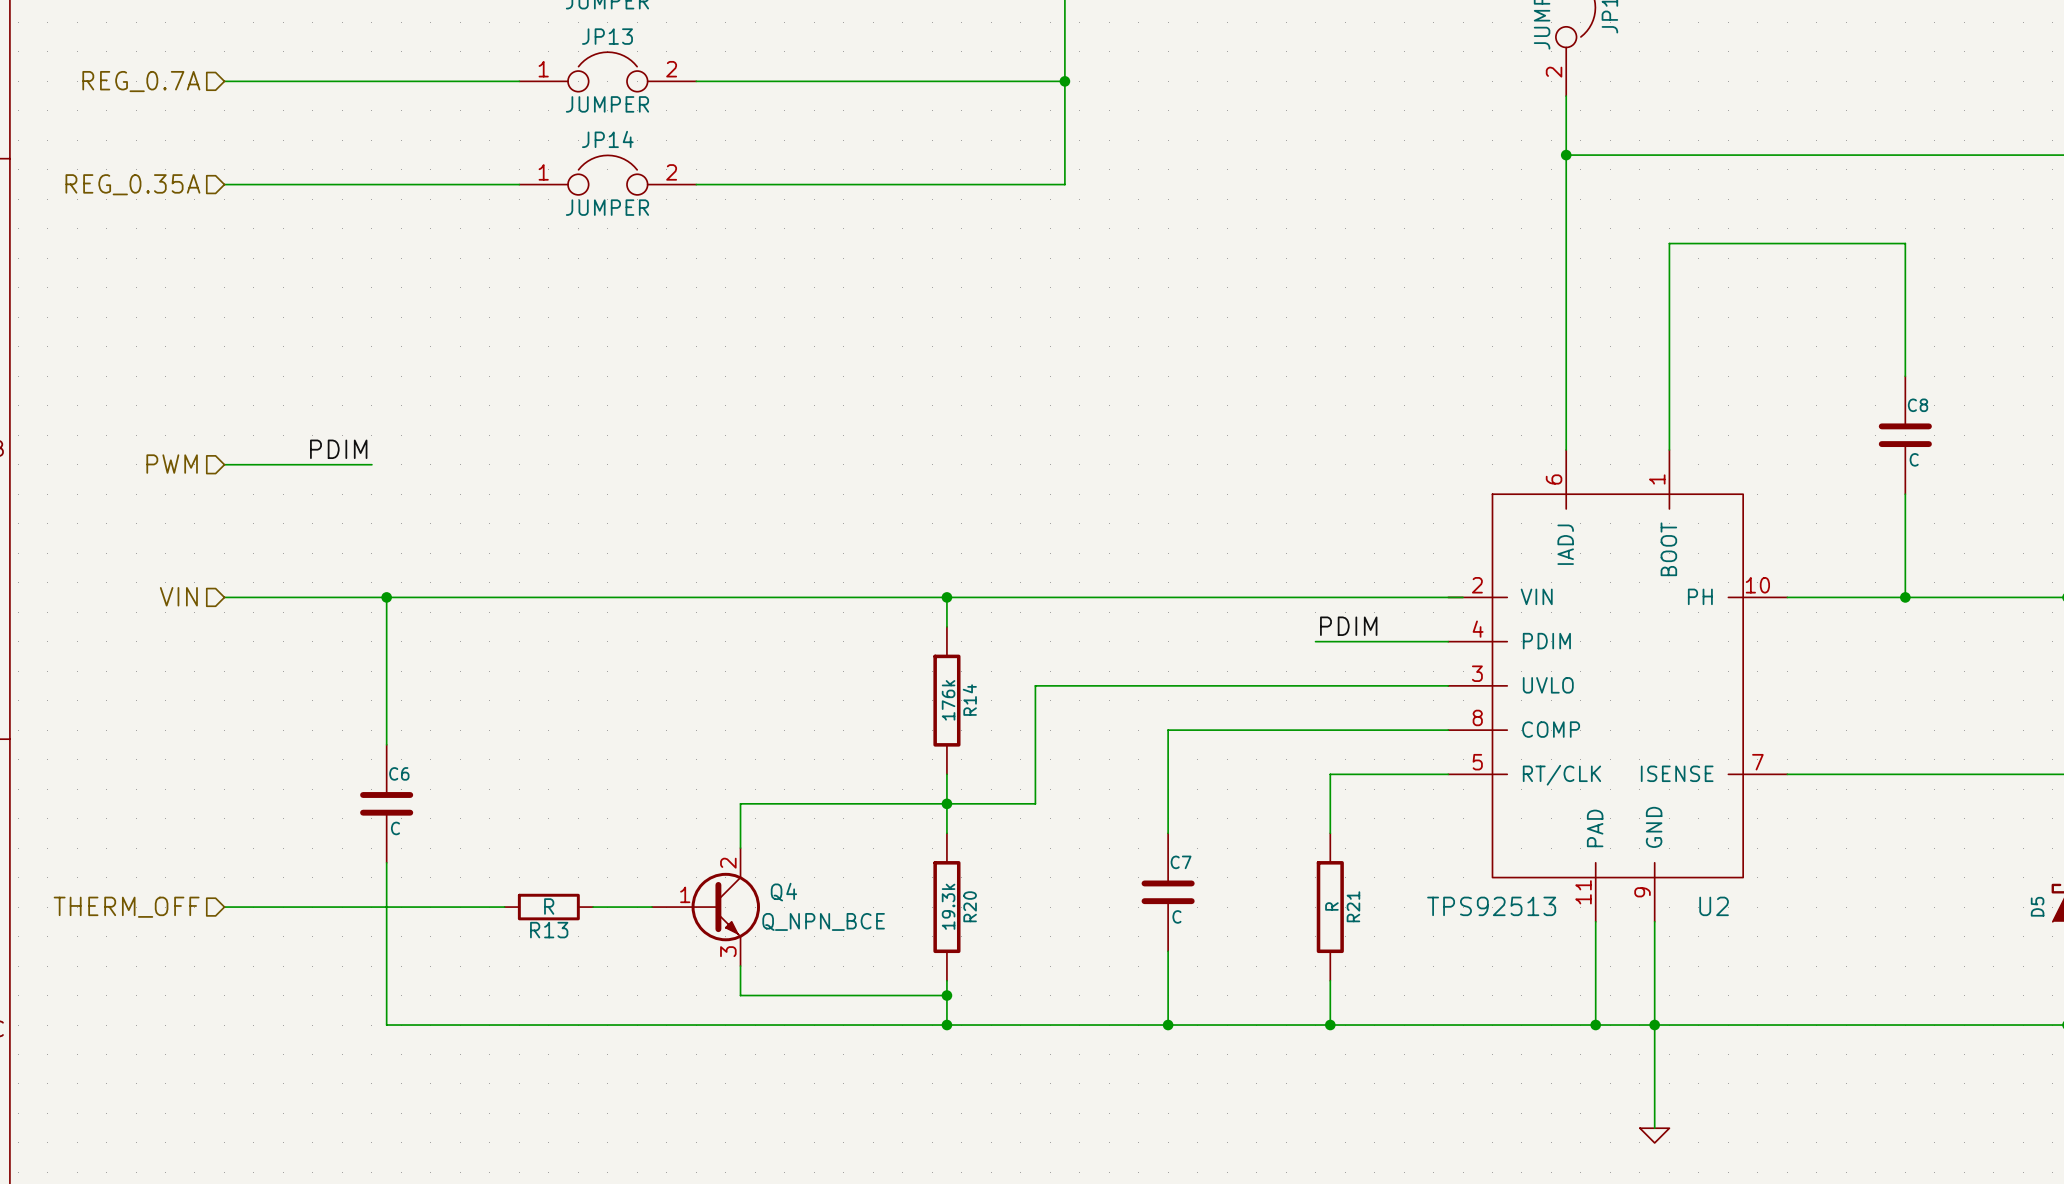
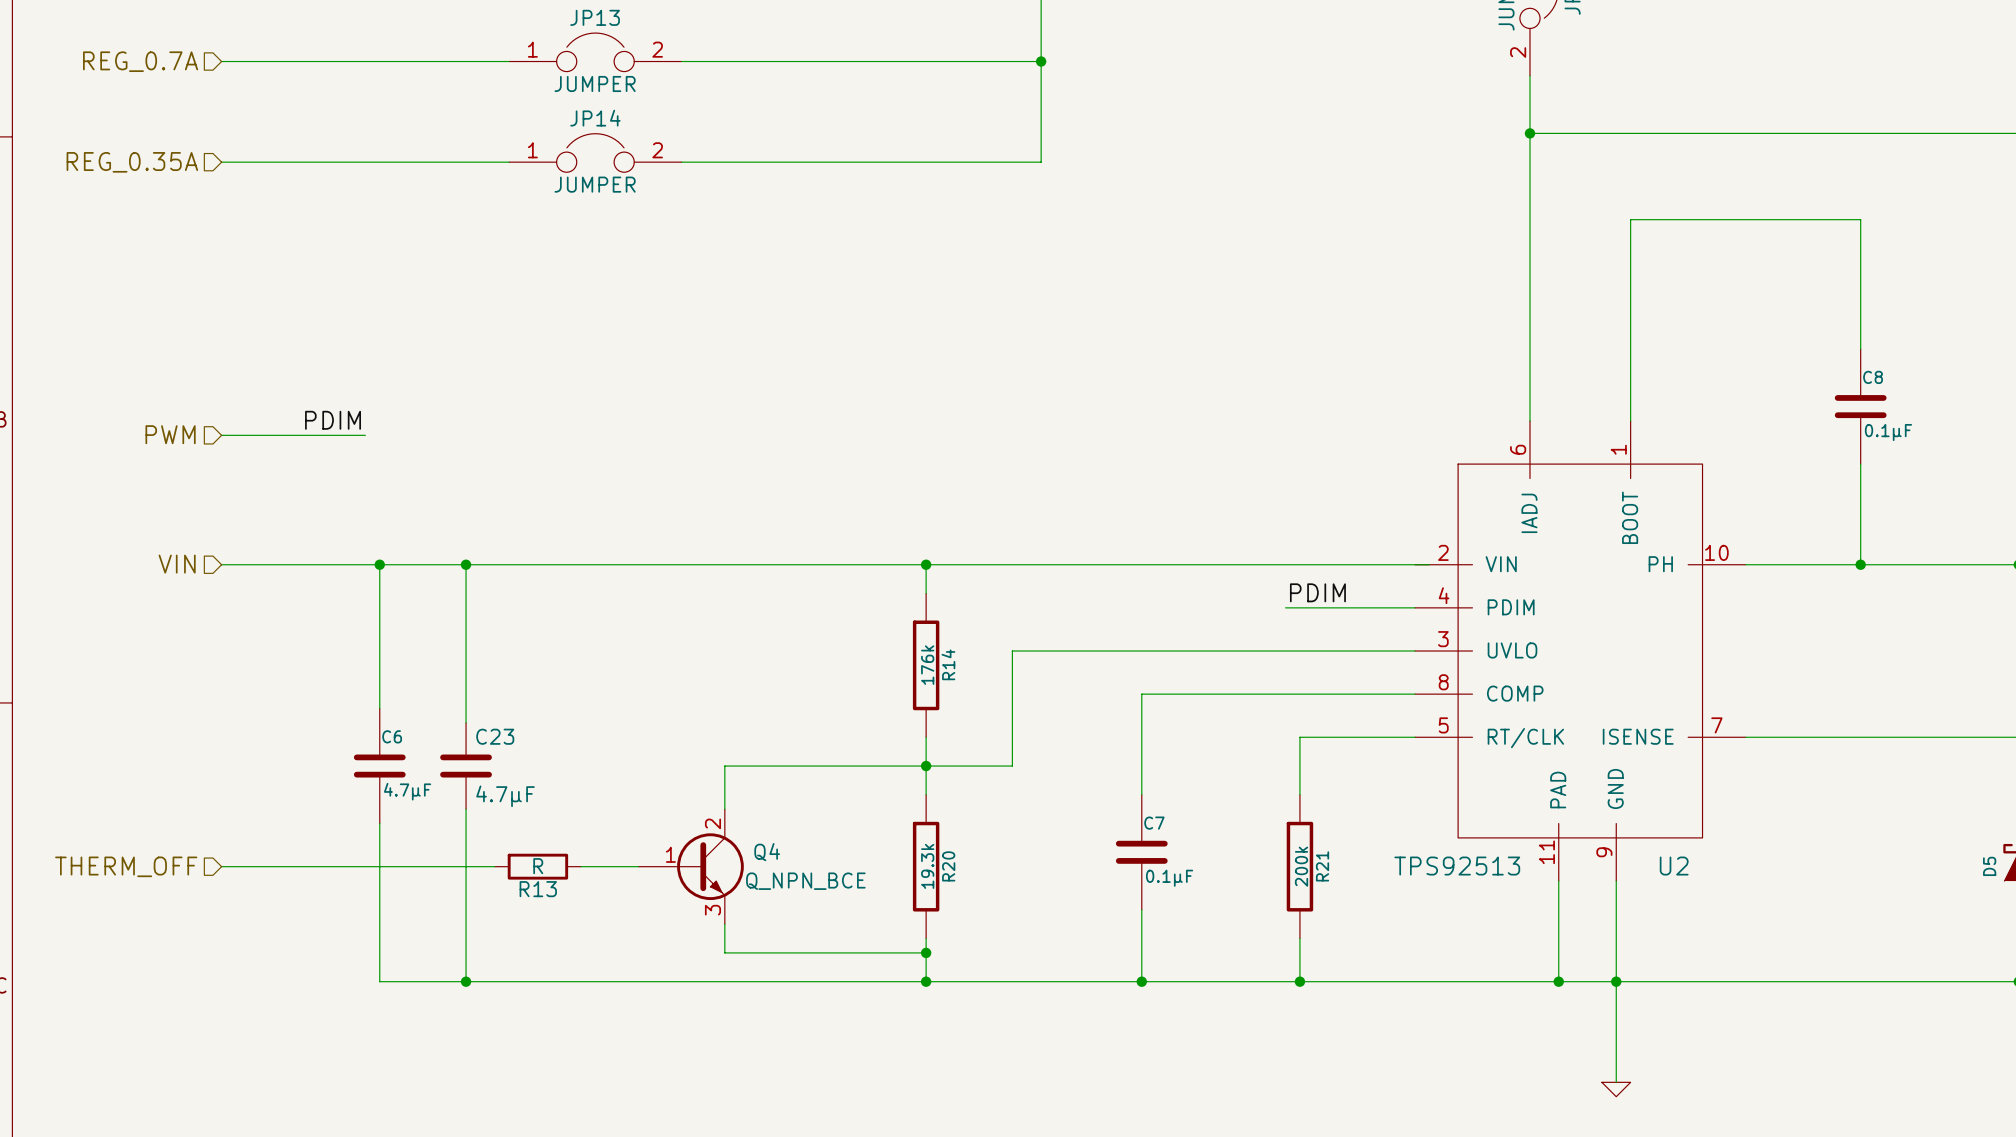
C8 value: C (1914, 459) -> 0.1µF (1888, 432)
wire: none -> (466, 564) (466, 722)
junction: none -> (466, 564)
C23: none -> 4.7µF (466, 766)
C6 value: C (395, 828) -> 4.7µF (407, 791)
wire: none -> (466, 809) (466, 981)
R21 value: R (1331, 906) -> 200k (1301, 866)
C7 value: C (1176, 916) -> 0.1µF (1169, 878)
junction: none -> (466, 981)

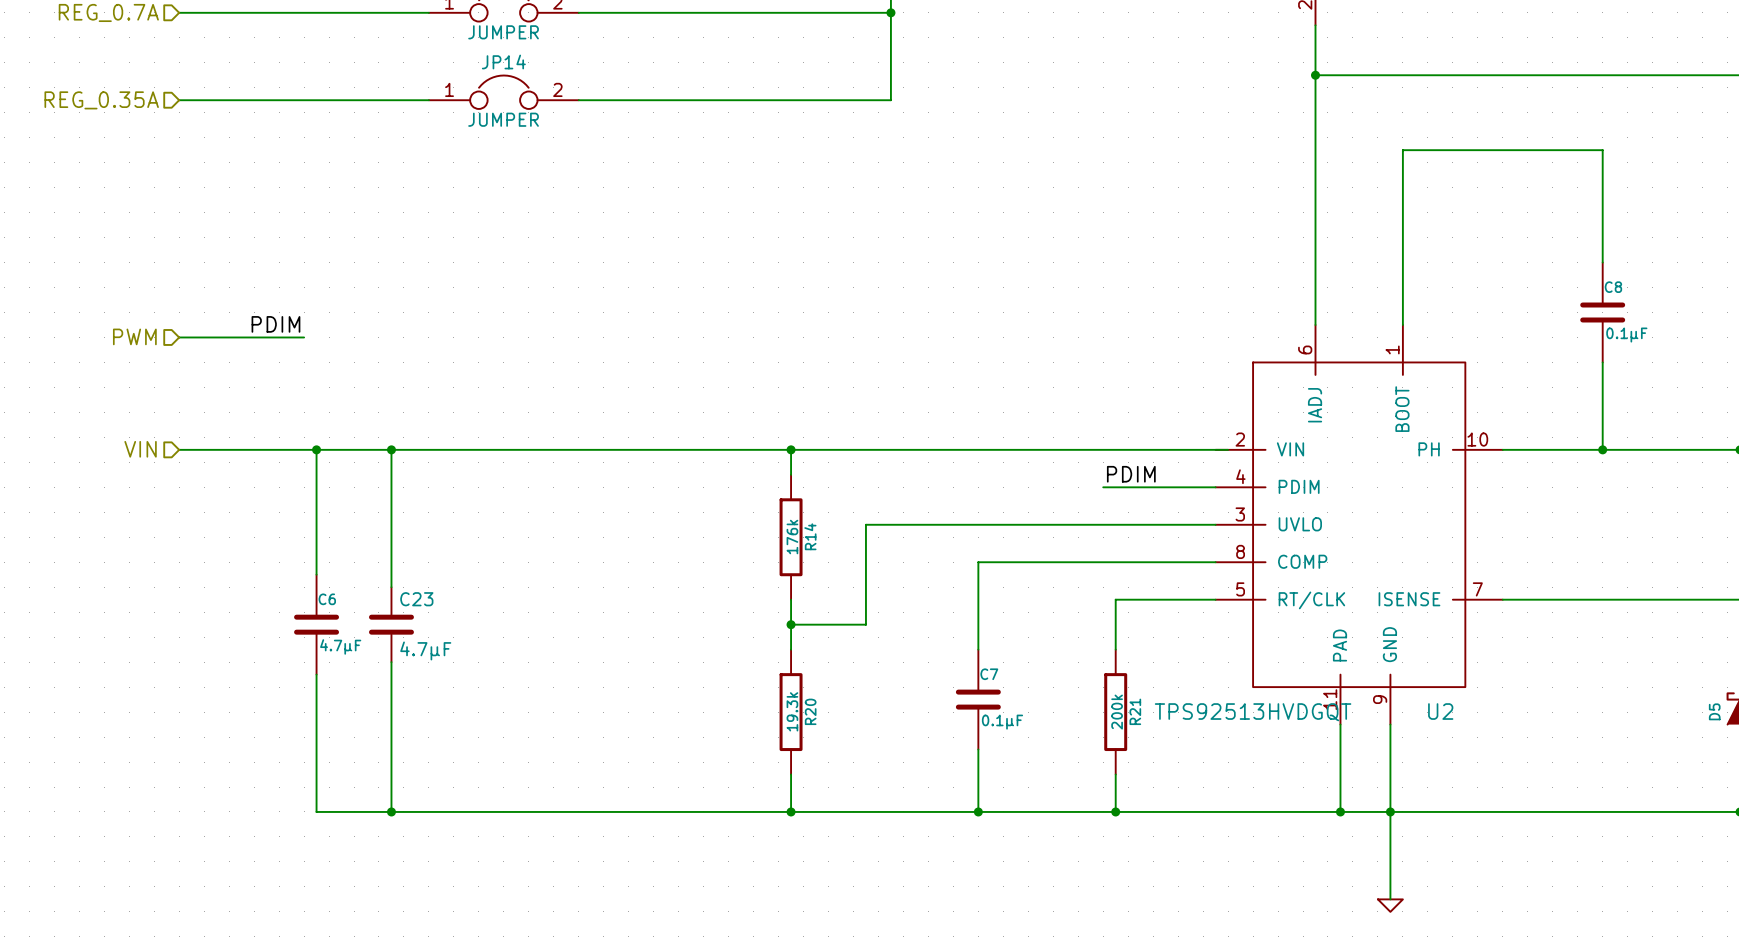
wire: (926, 766) (724, 766) (724, 809) -> none
hierarchical label: THERM_OFF (126, 866) -> none
wire: (221, 866) (494, 866) -> none
R13: R (537, 866) -> none
wire: (581, 866) (638, 866) -> none
Q4: Q_NPN_BCE (691, 866) -> none
U2 value: TPS92513 (1457, 866) -> TPS92513HVDGQT (1253, 712)
wire: (724, 924) (724, 952) (926, 952) -> none
junction: (926, 952) -> none

